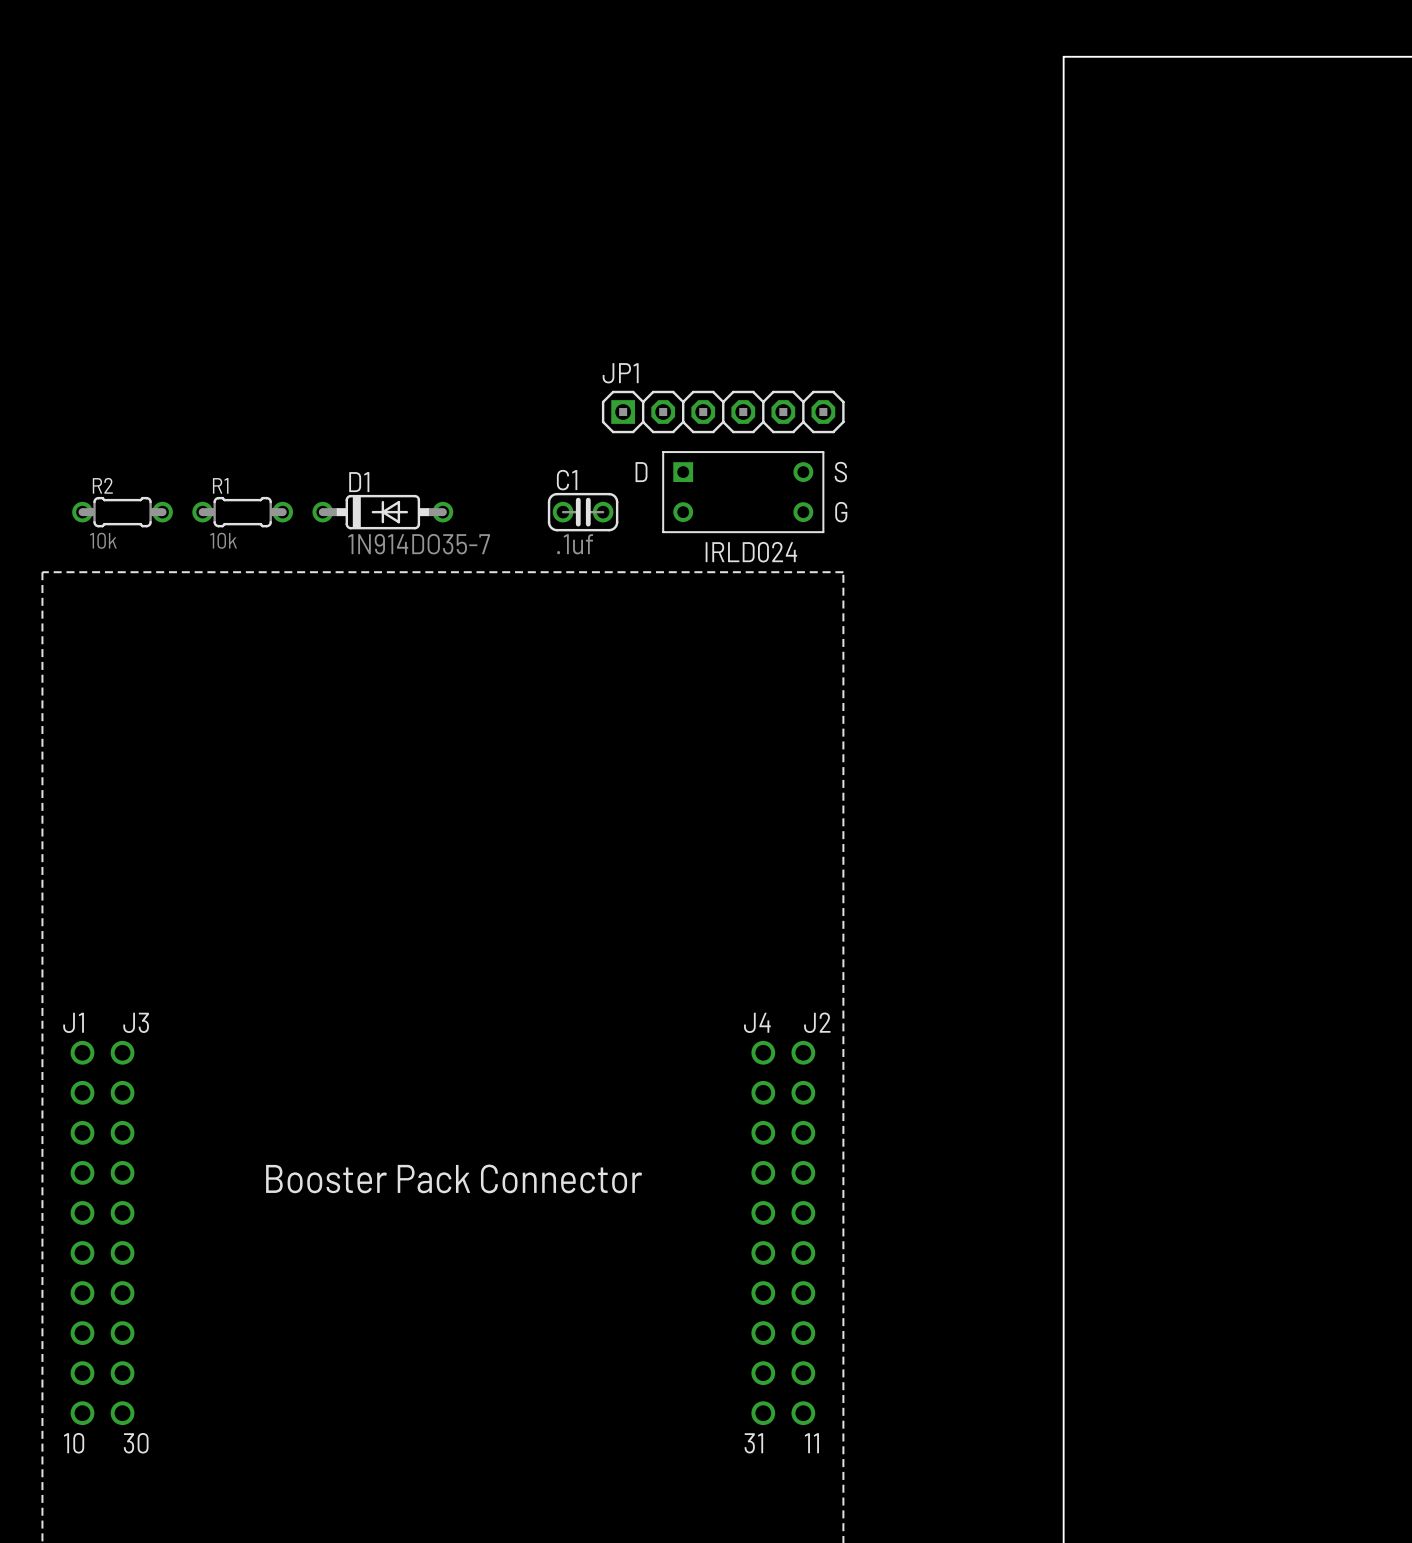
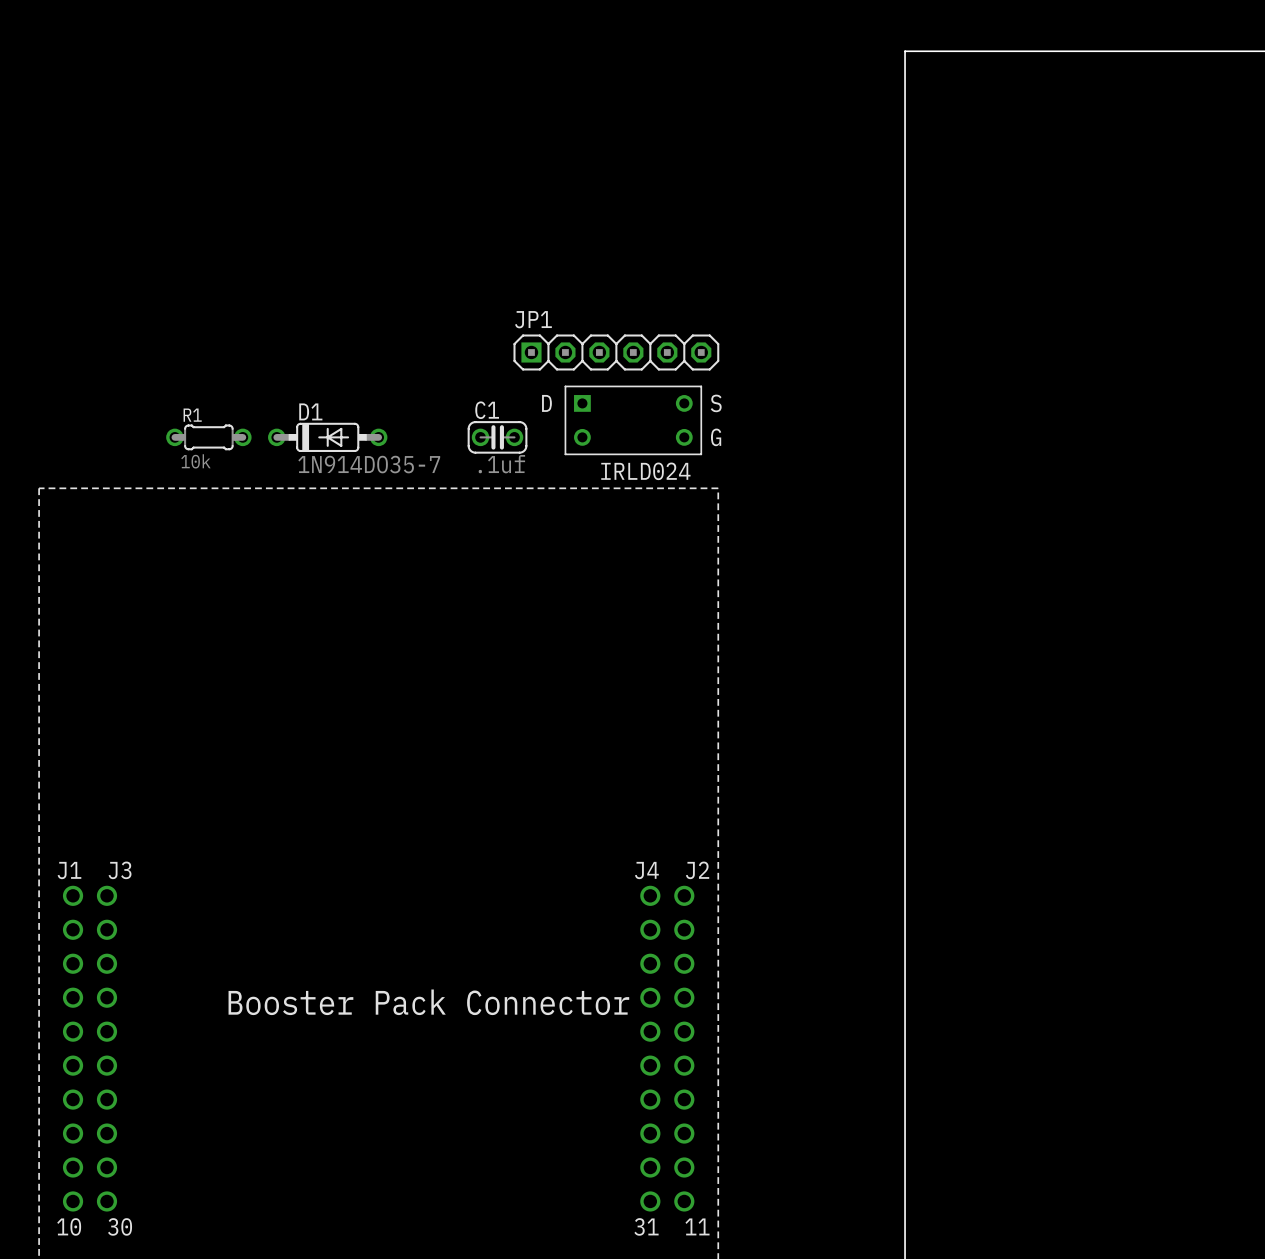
R2: 10k (122, 512) -> none

